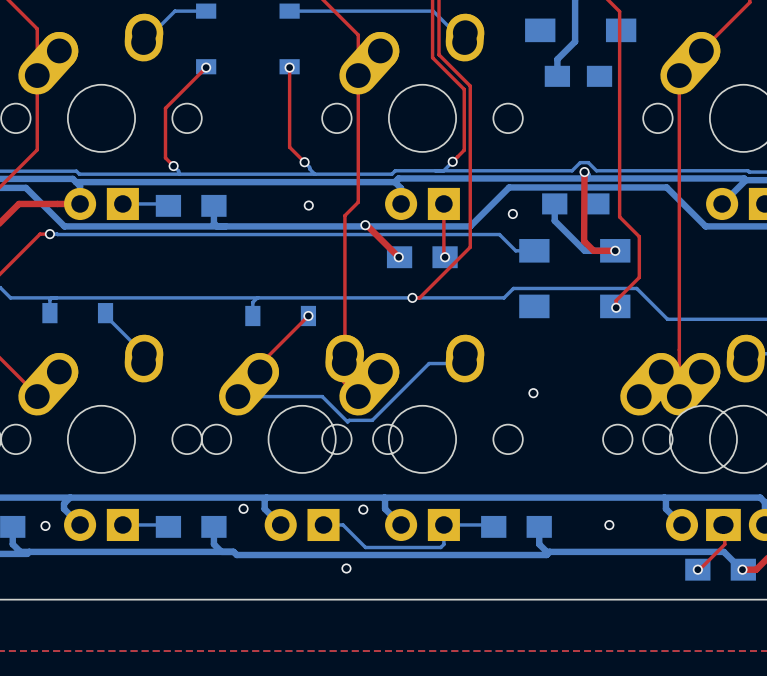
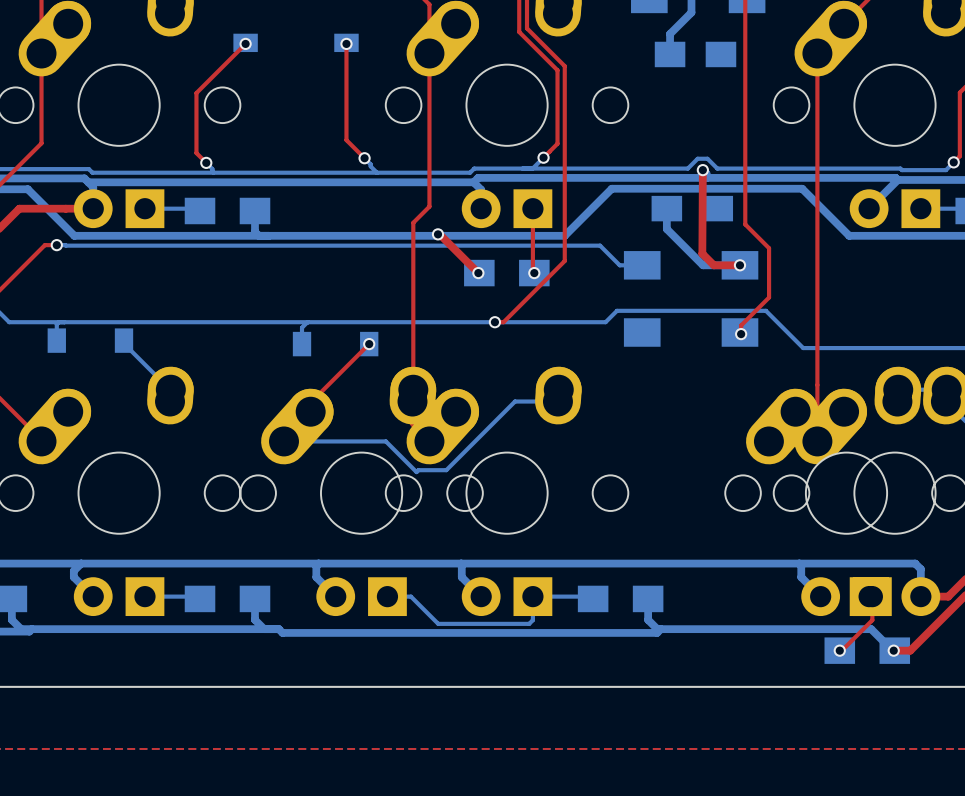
via: (308, 205) -> none
via: (512, 213) -> none
via: (533, 393) -> none
via: (243, 508) -> none
via: (363, 509) -> none
via: (45, 525) -> none
via: (609, 525) -> none
via: (346, 568) -> none

